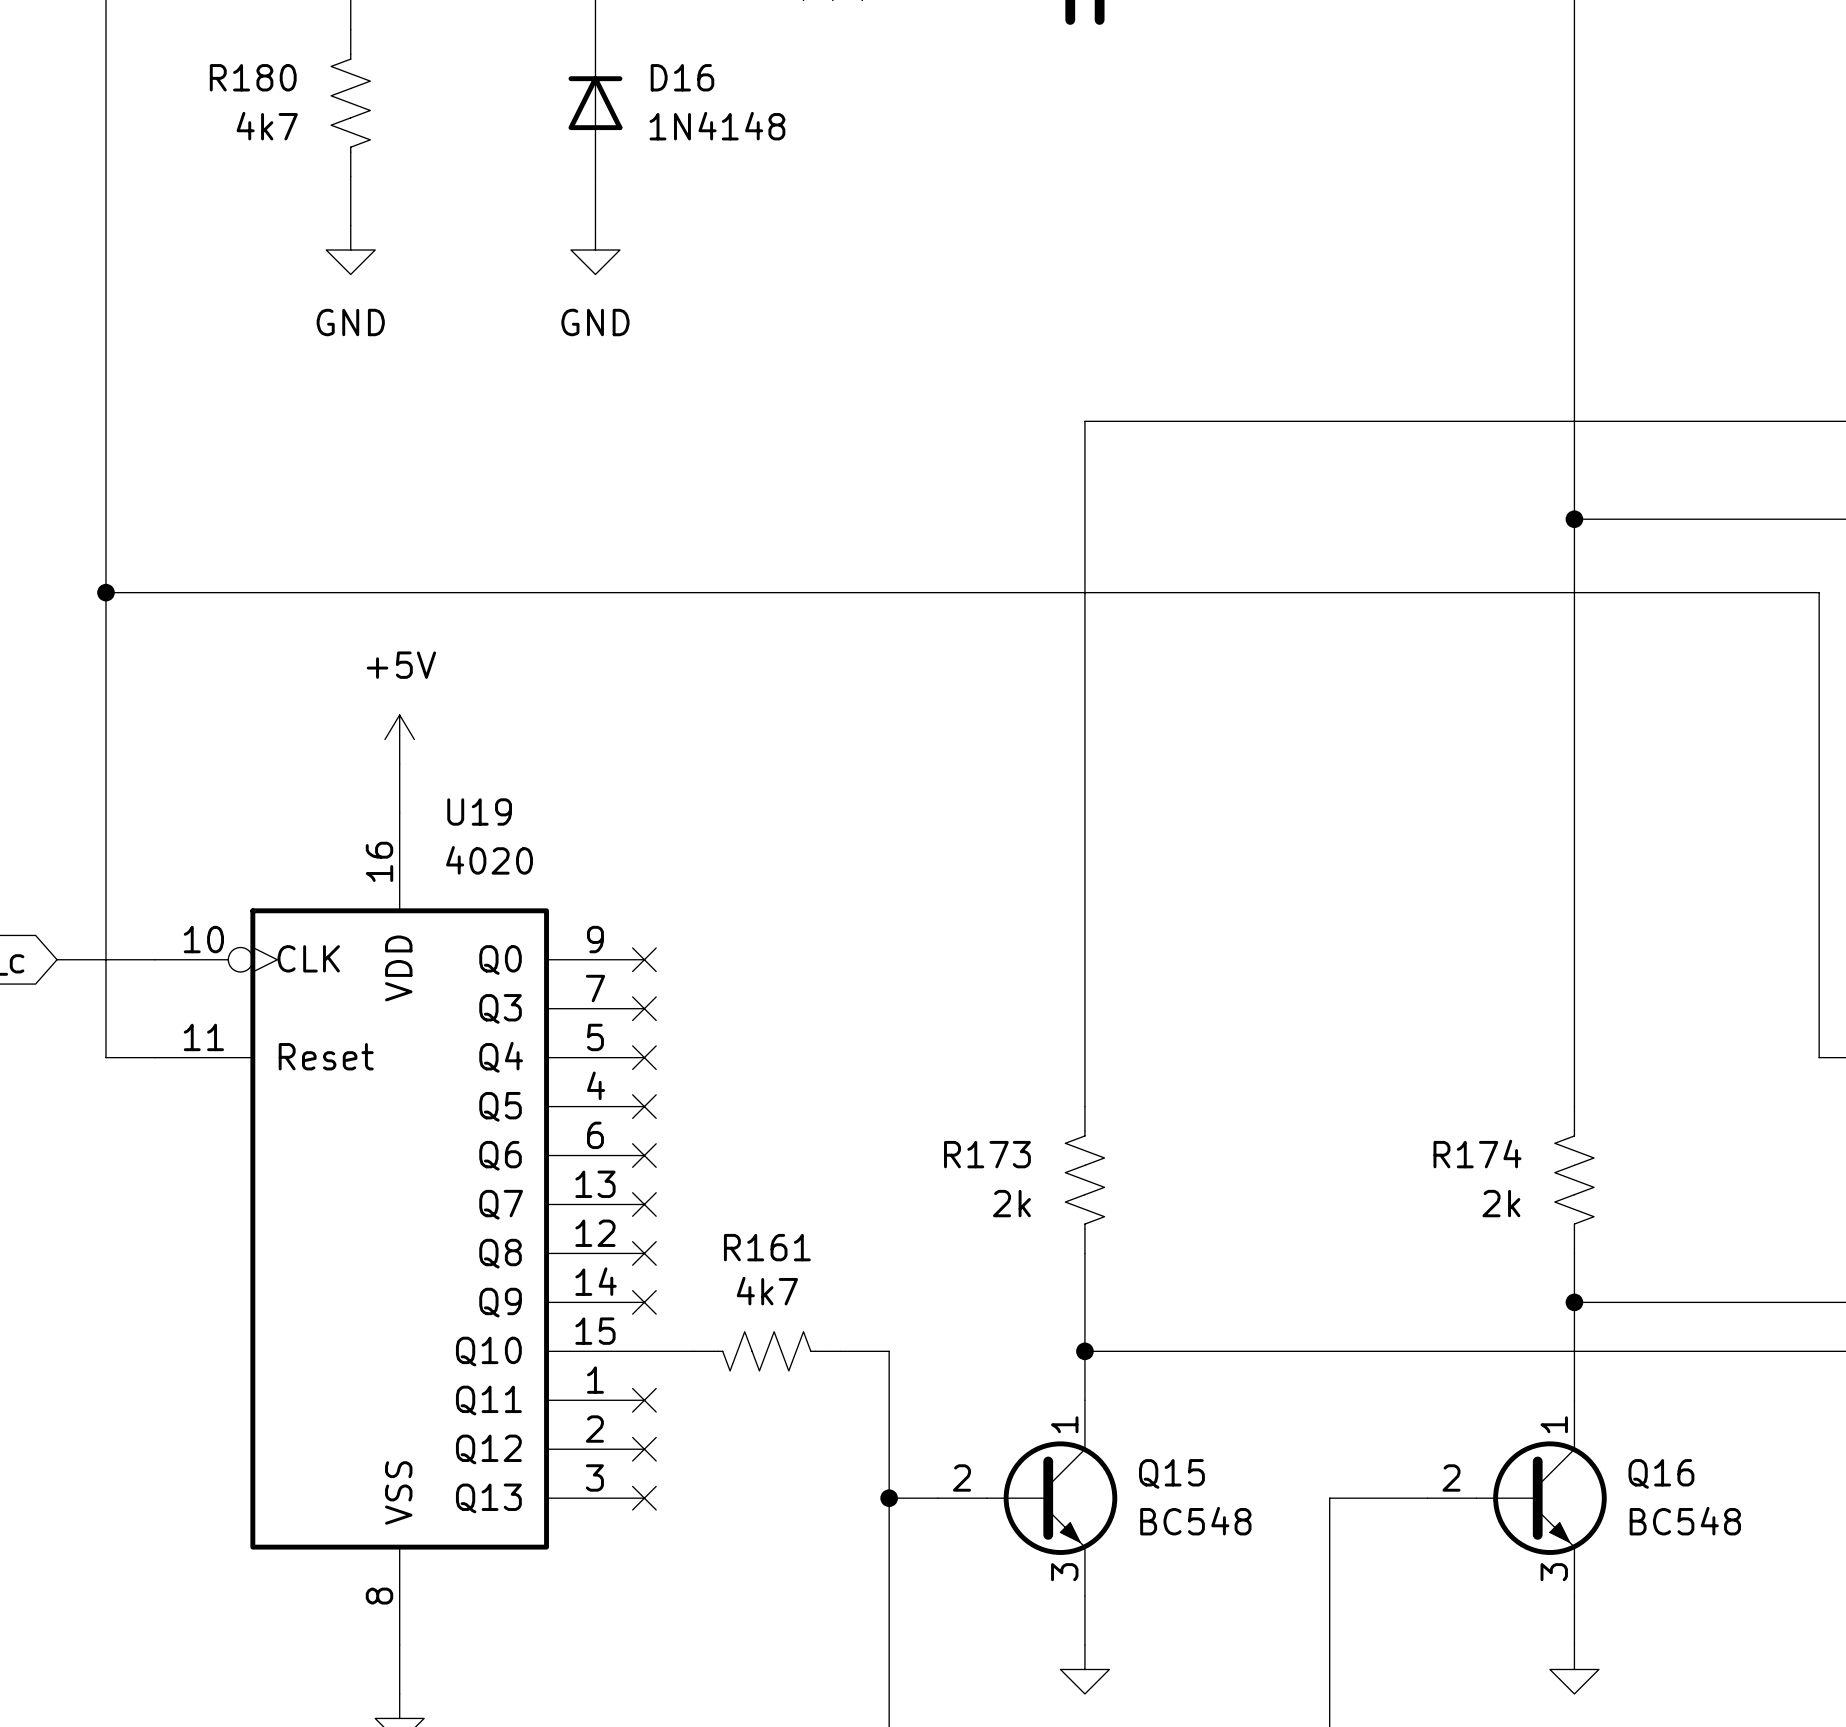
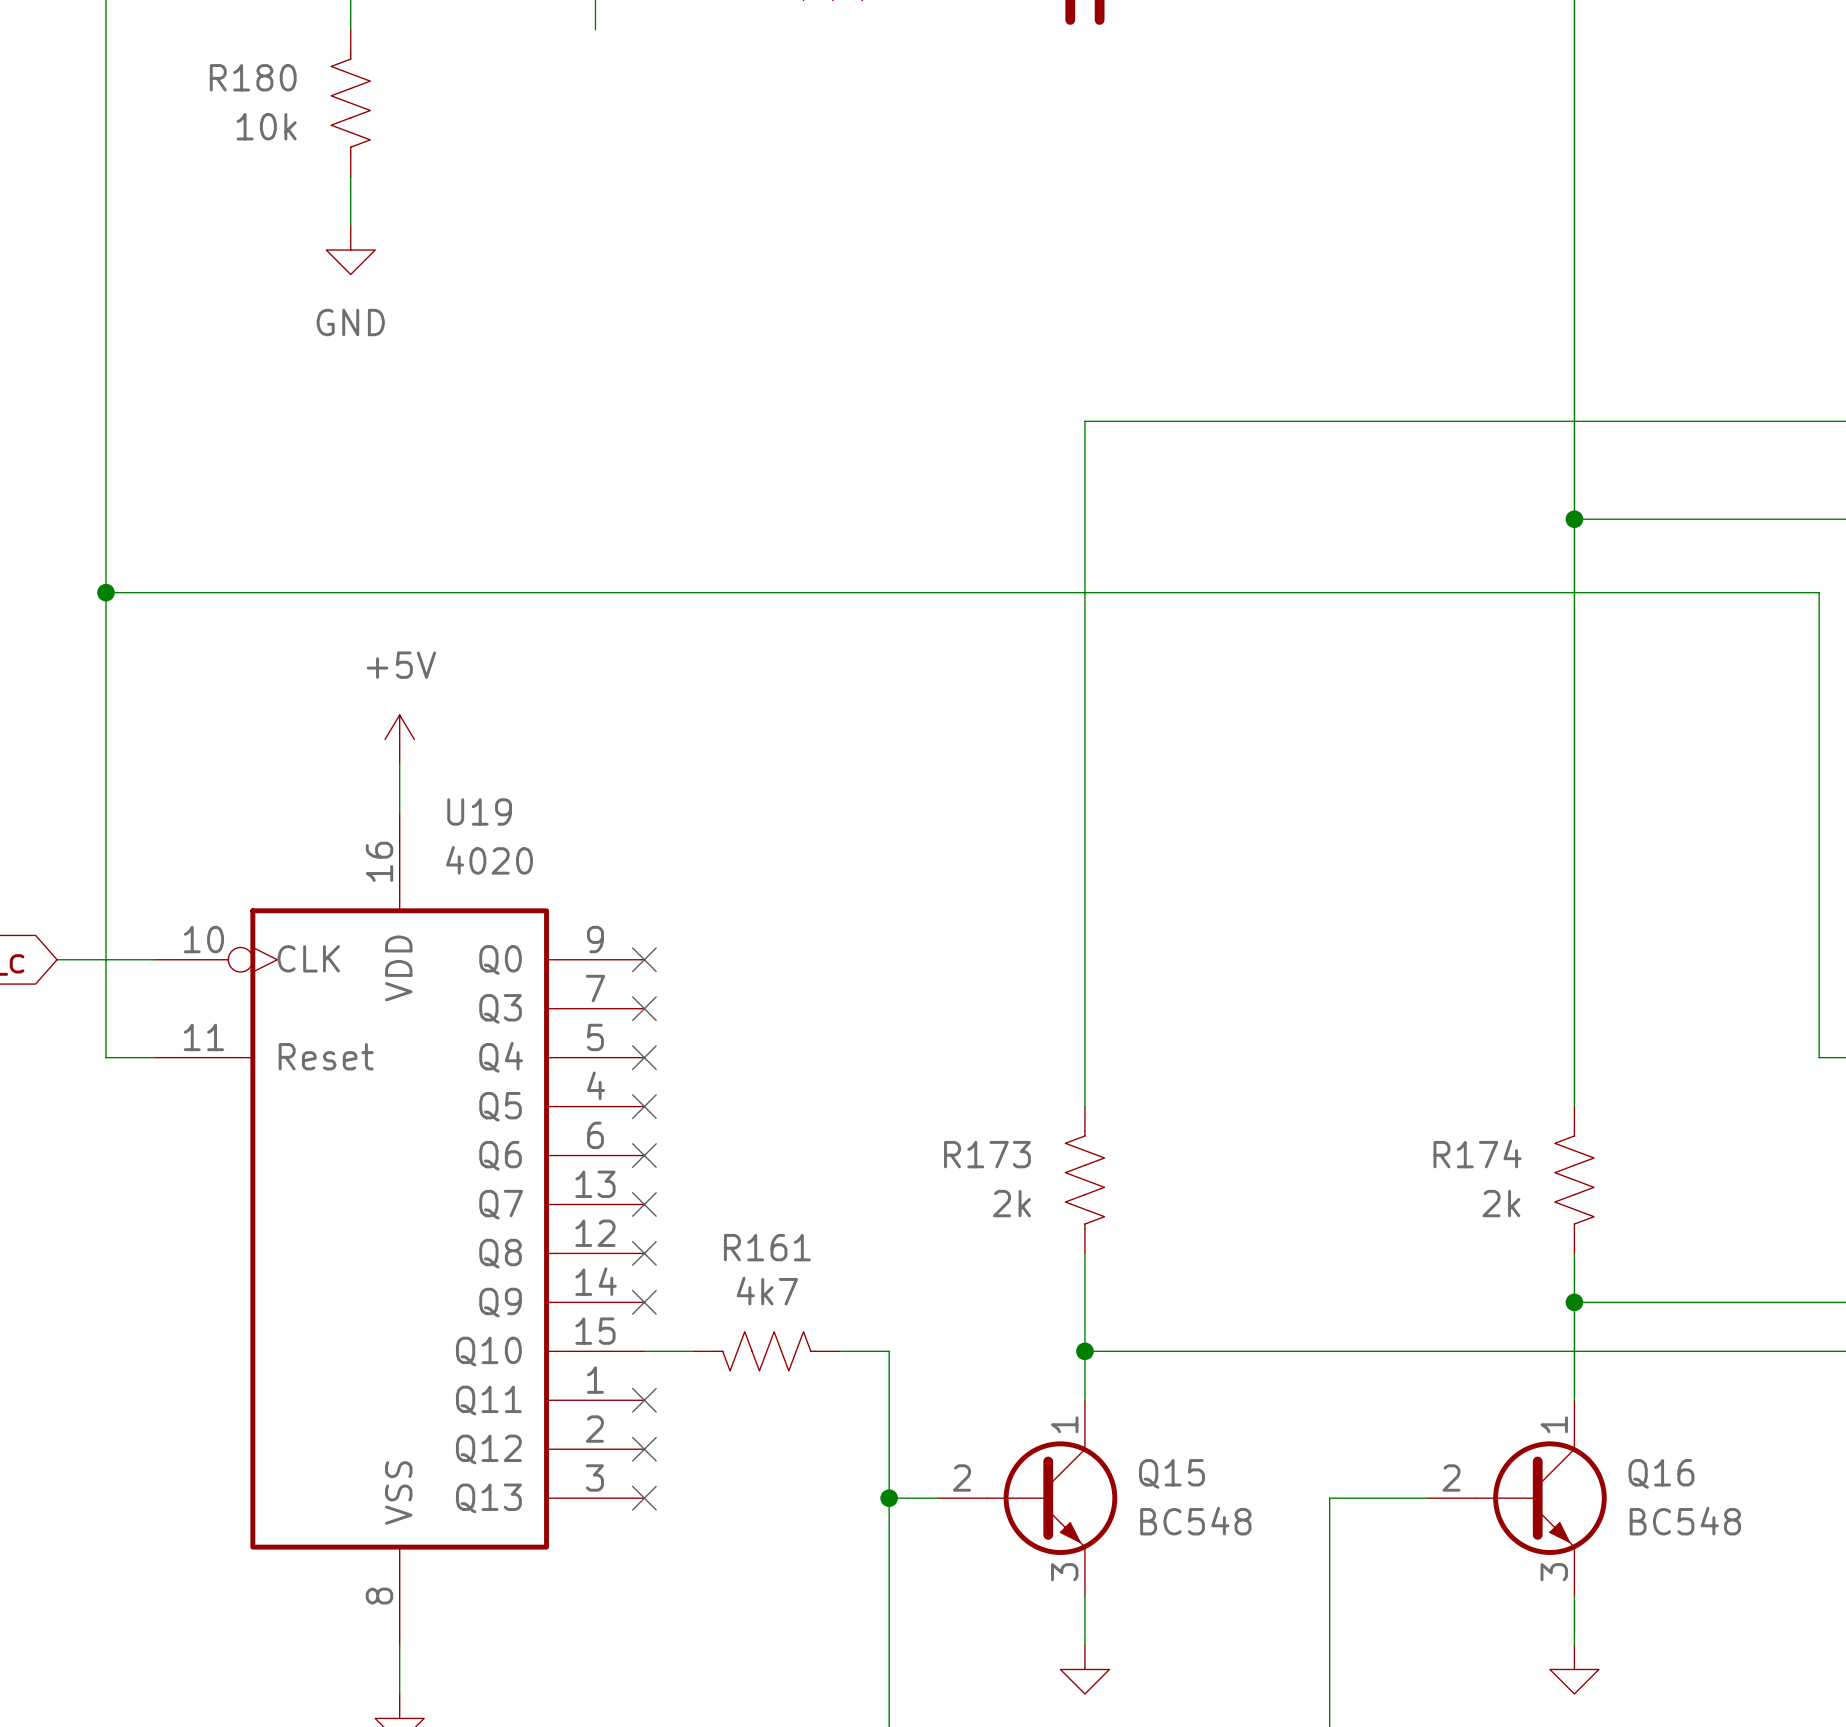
D16: 1N4148 (595, 103) -> none
R180 value: 4k7 (267, 126) -> 10k (266, 126)
wire: (595, 176) (595, 225) -> none
power symbol: GND (595, 250) -> none

